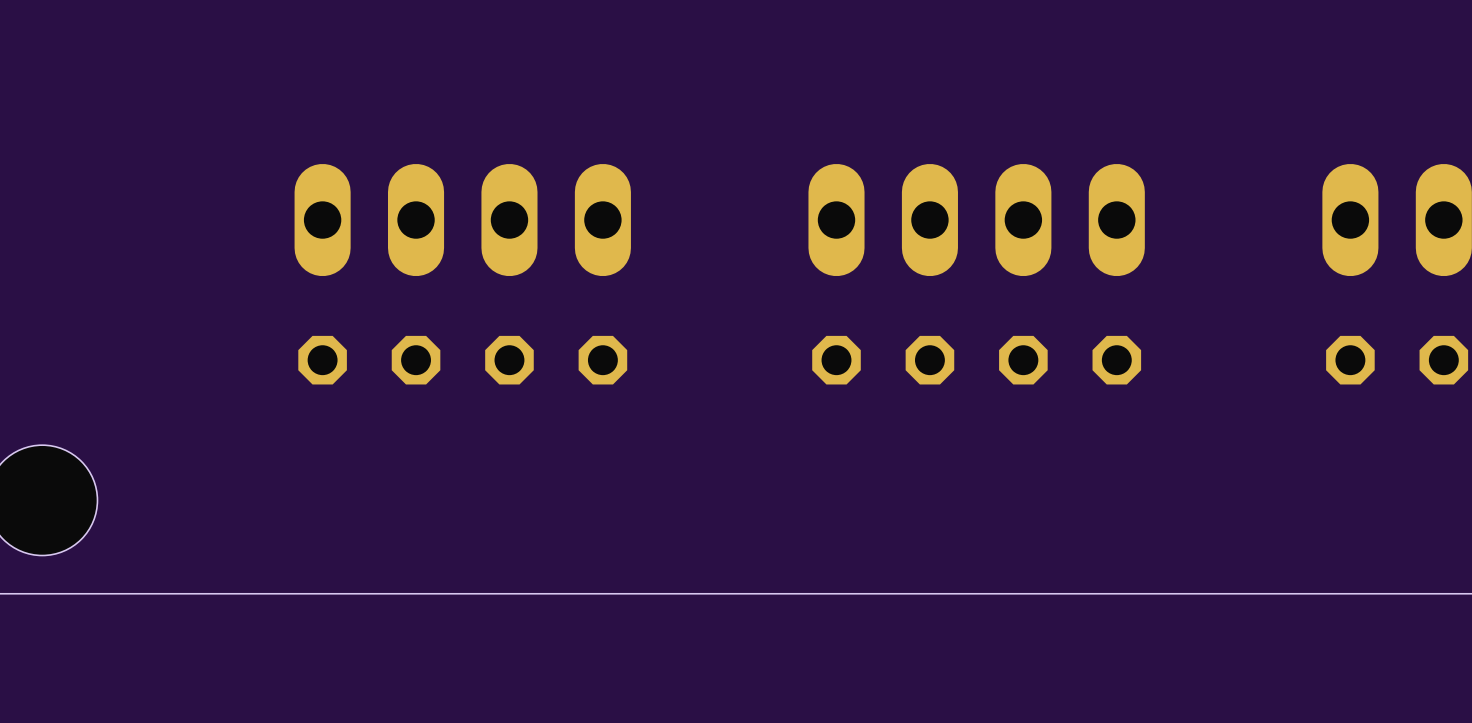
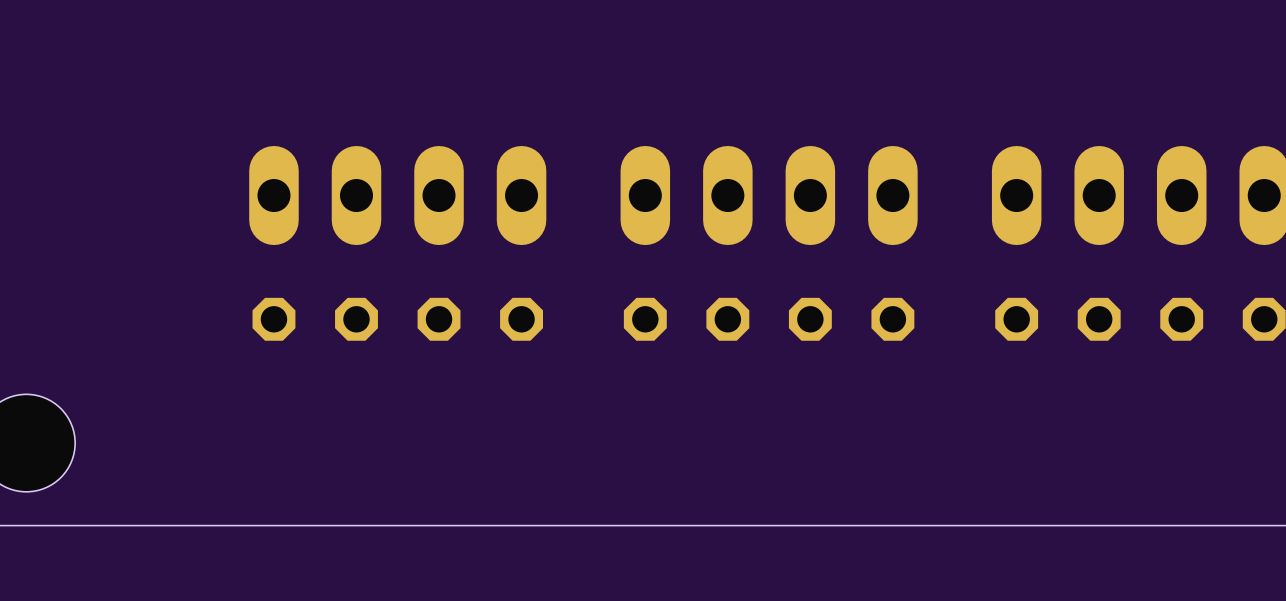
part: none -> (686, 195)
part: (1070, 220) -> none
part: none -> (1057, 195)
part: none -> (686, 319)
part: (1070, 360) -> none
part: none -> (1057, 319)

